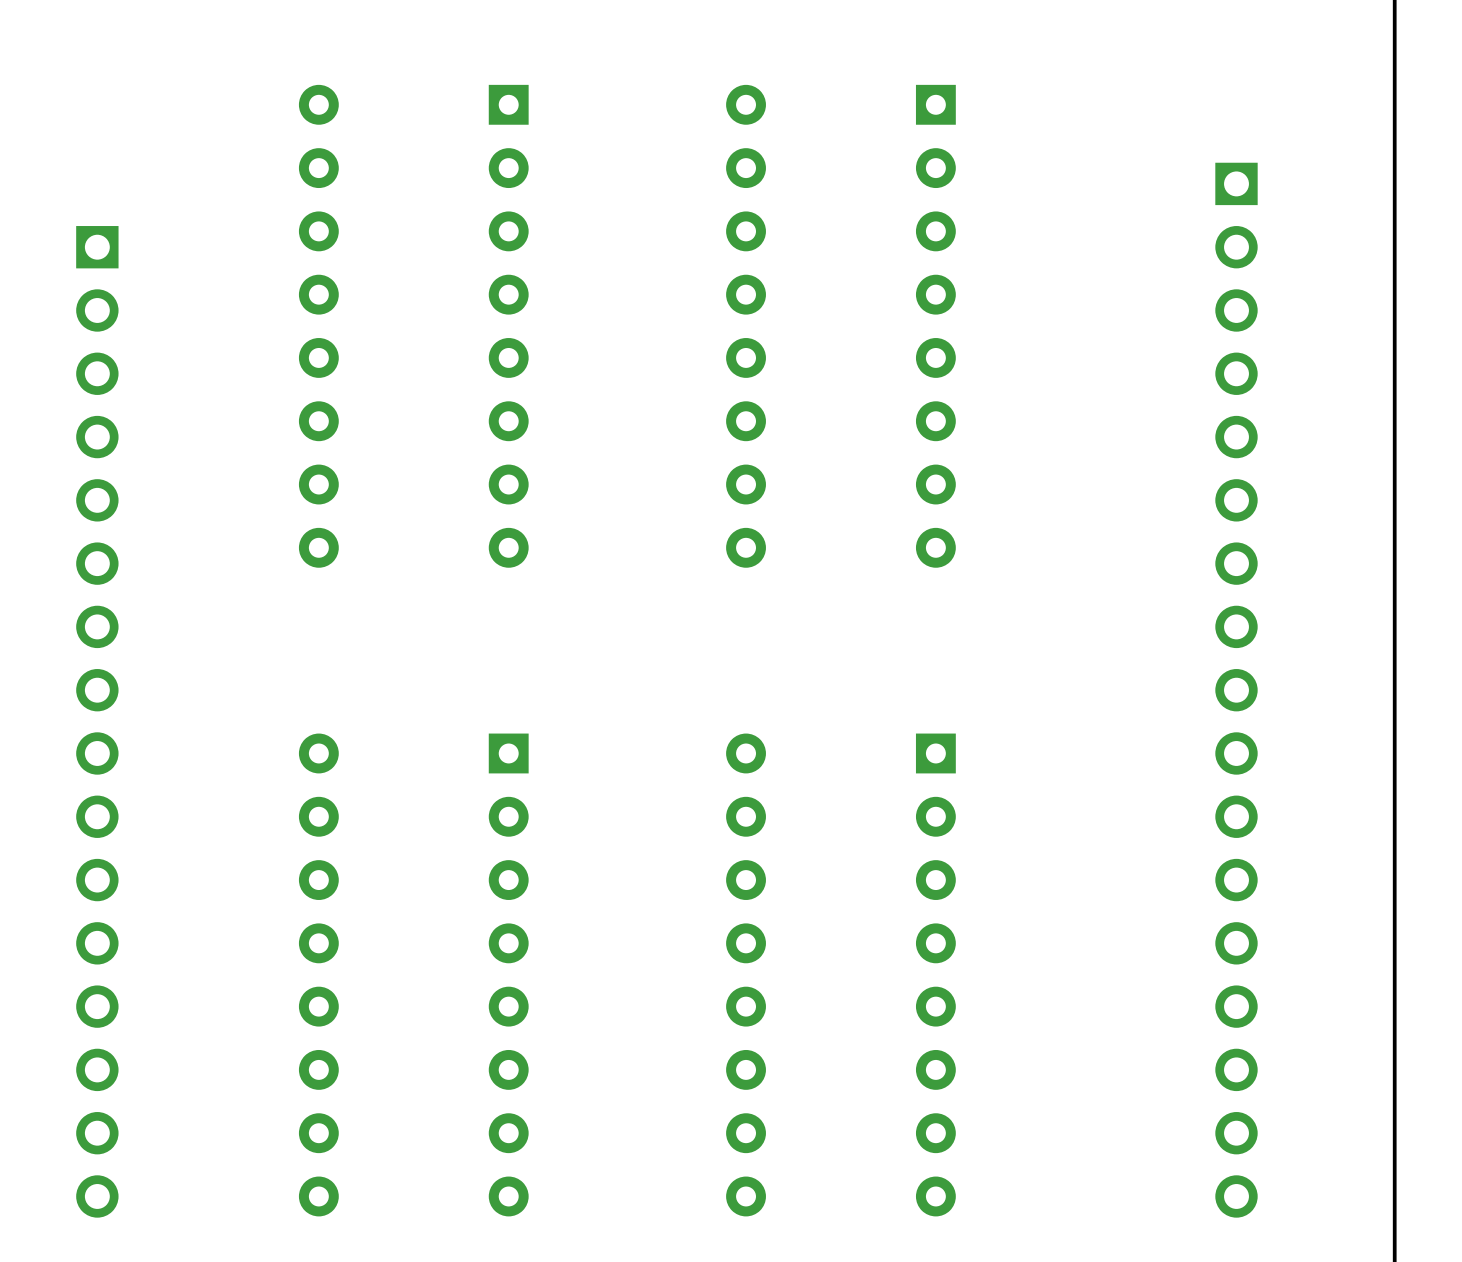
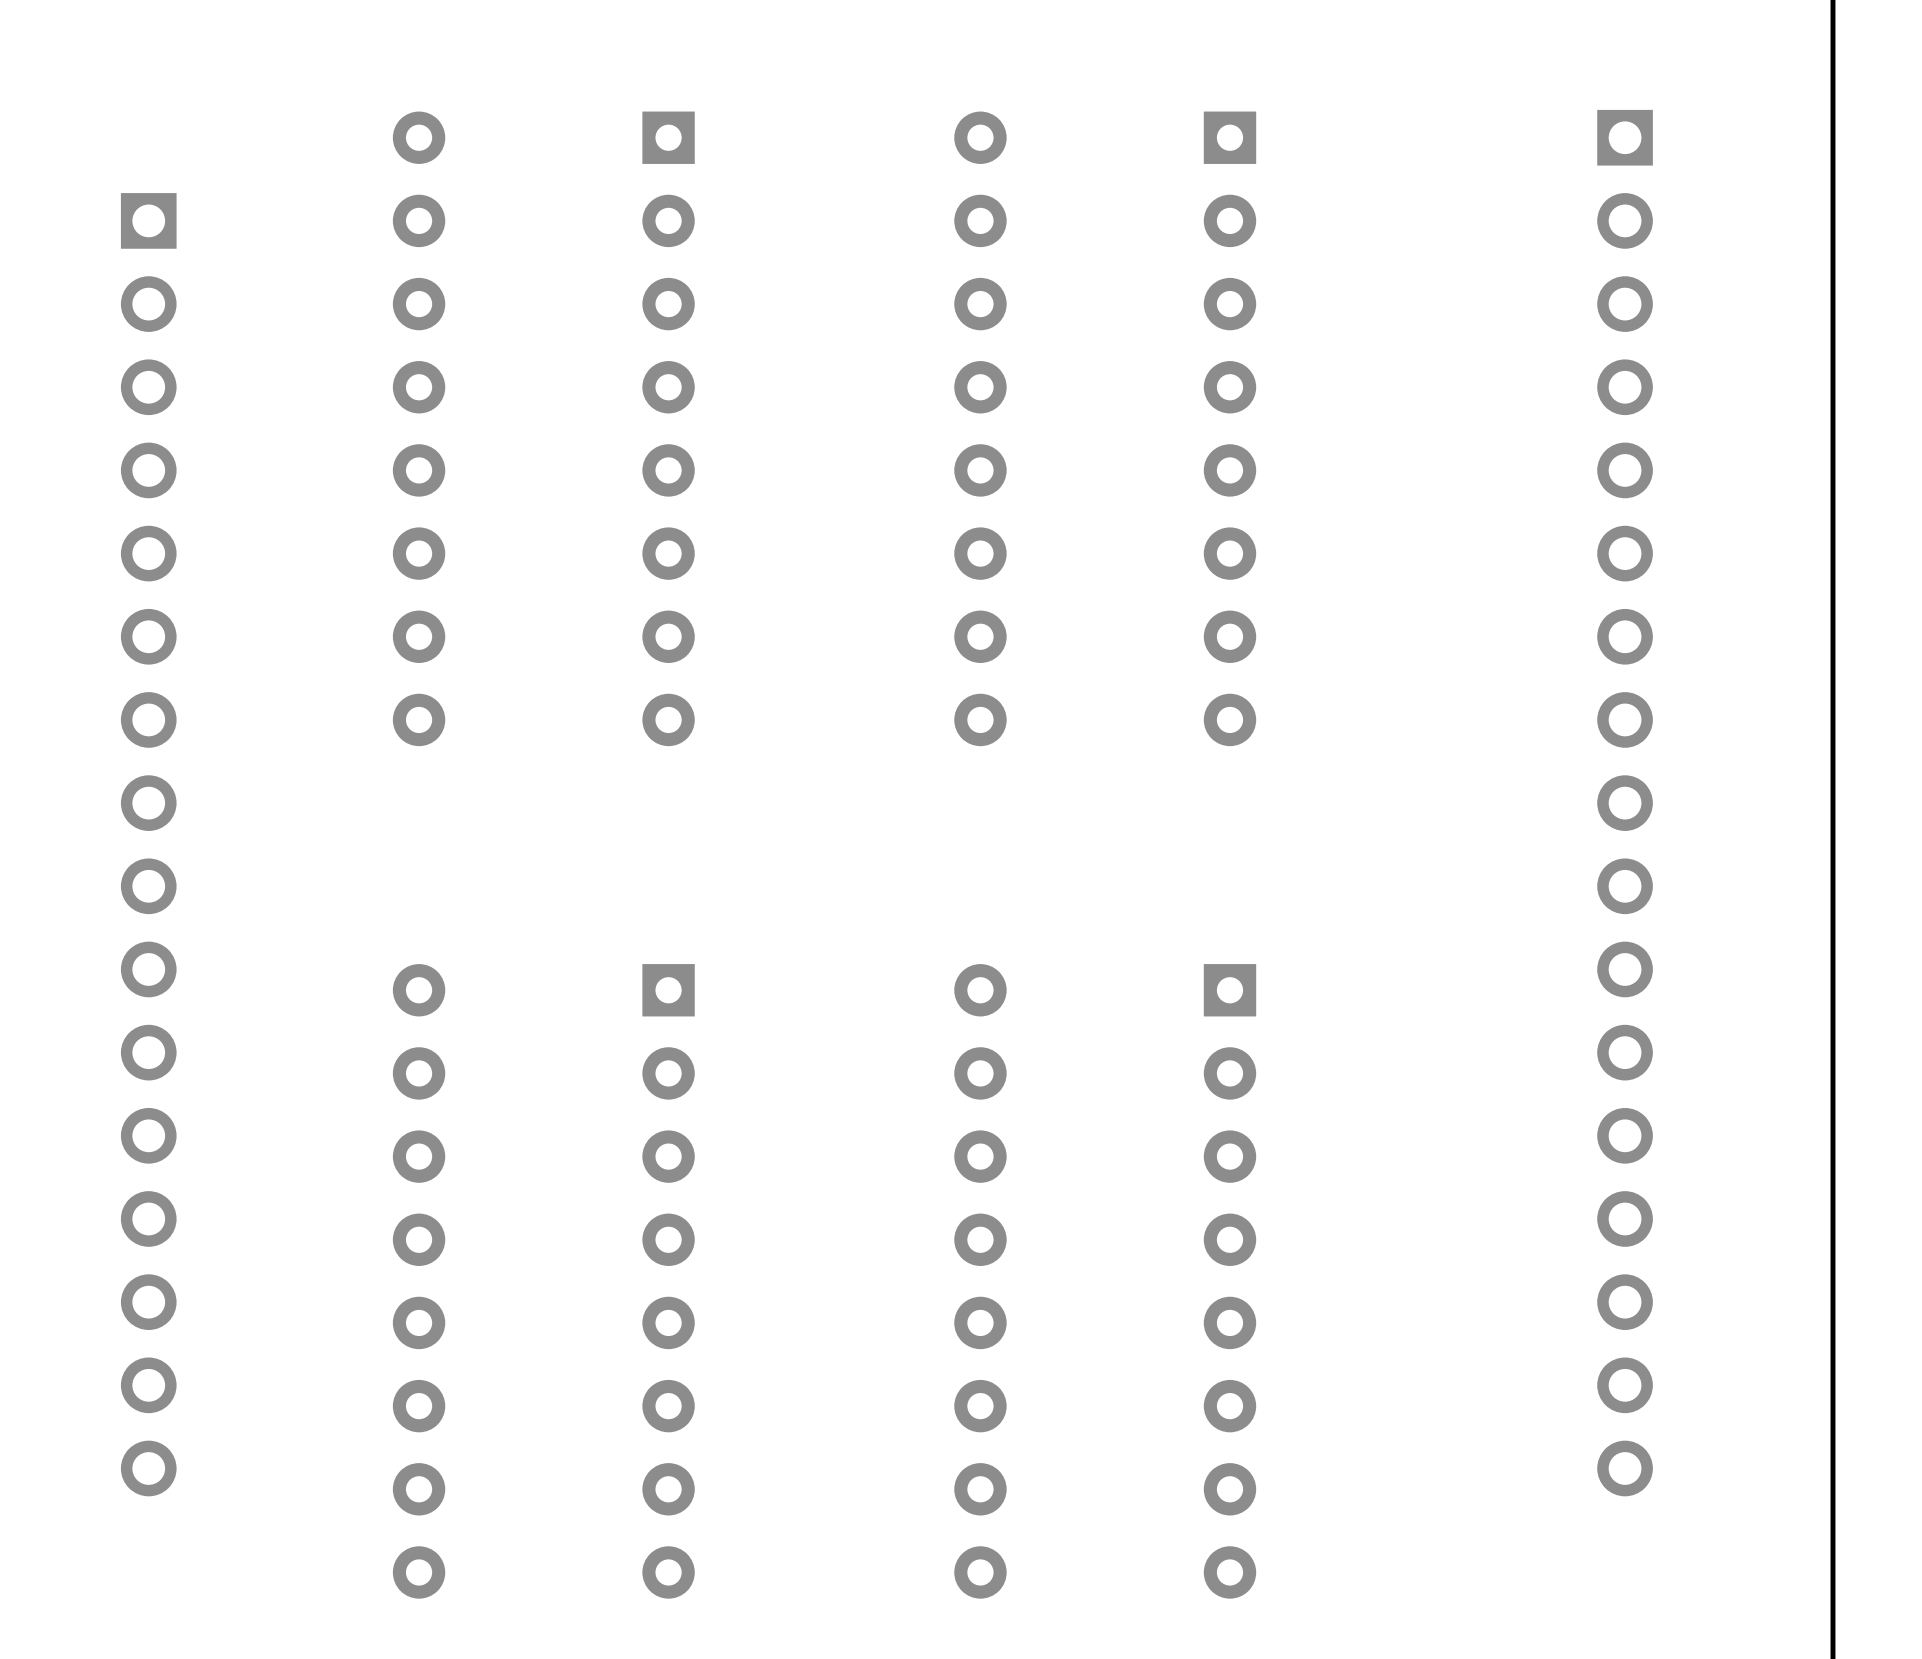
part position: (1236, 690) -> (1625, 803)
part position: (97, 721) -> (148, 844)

